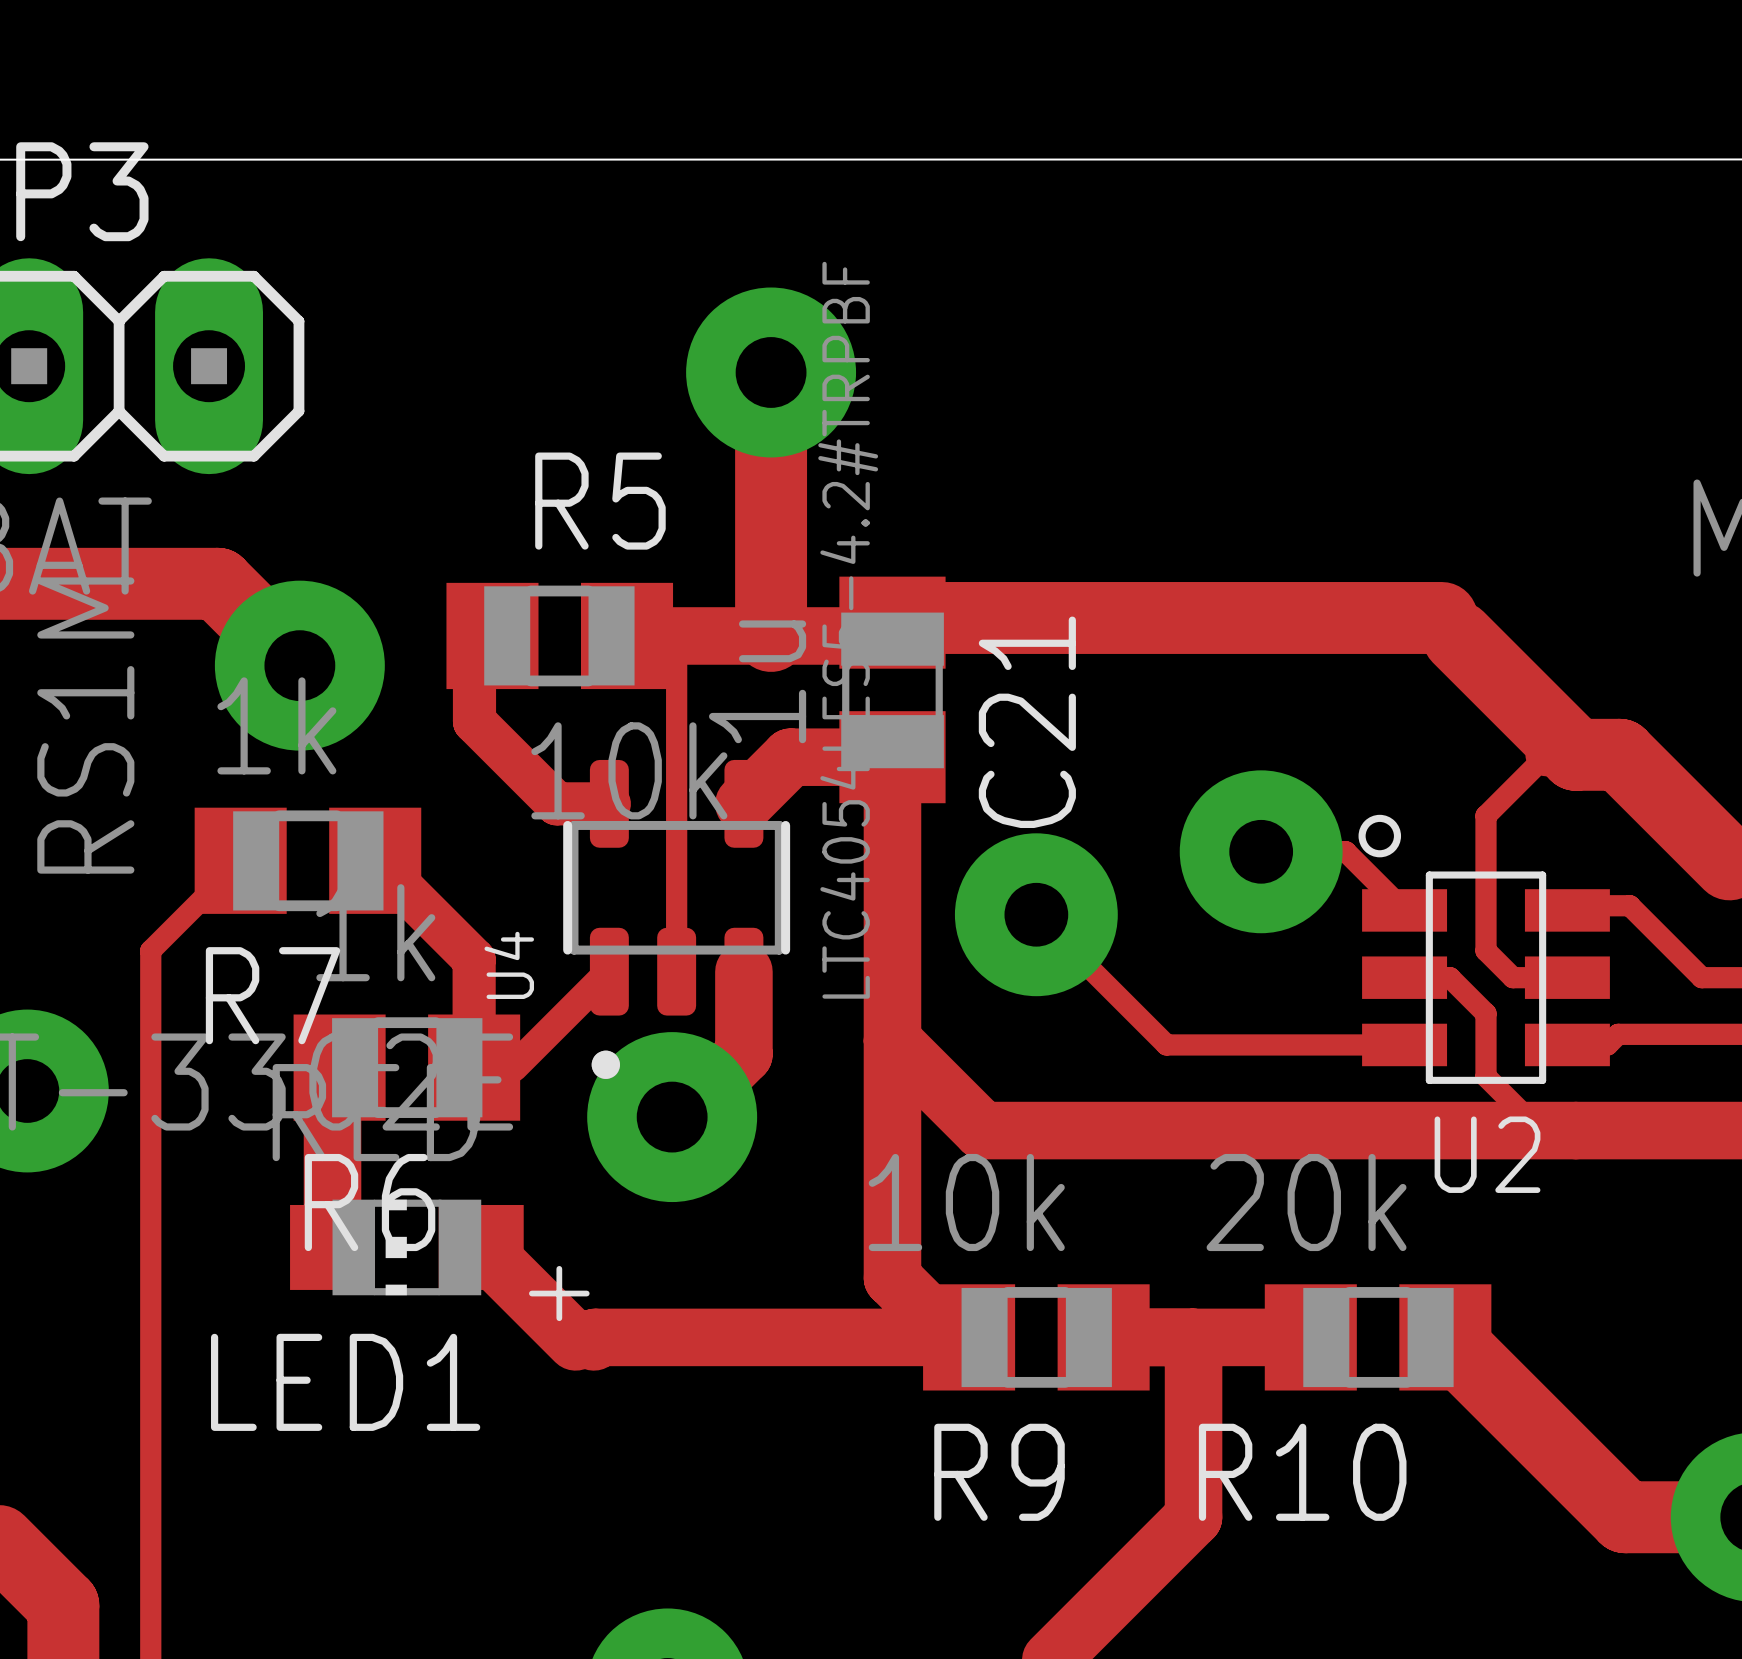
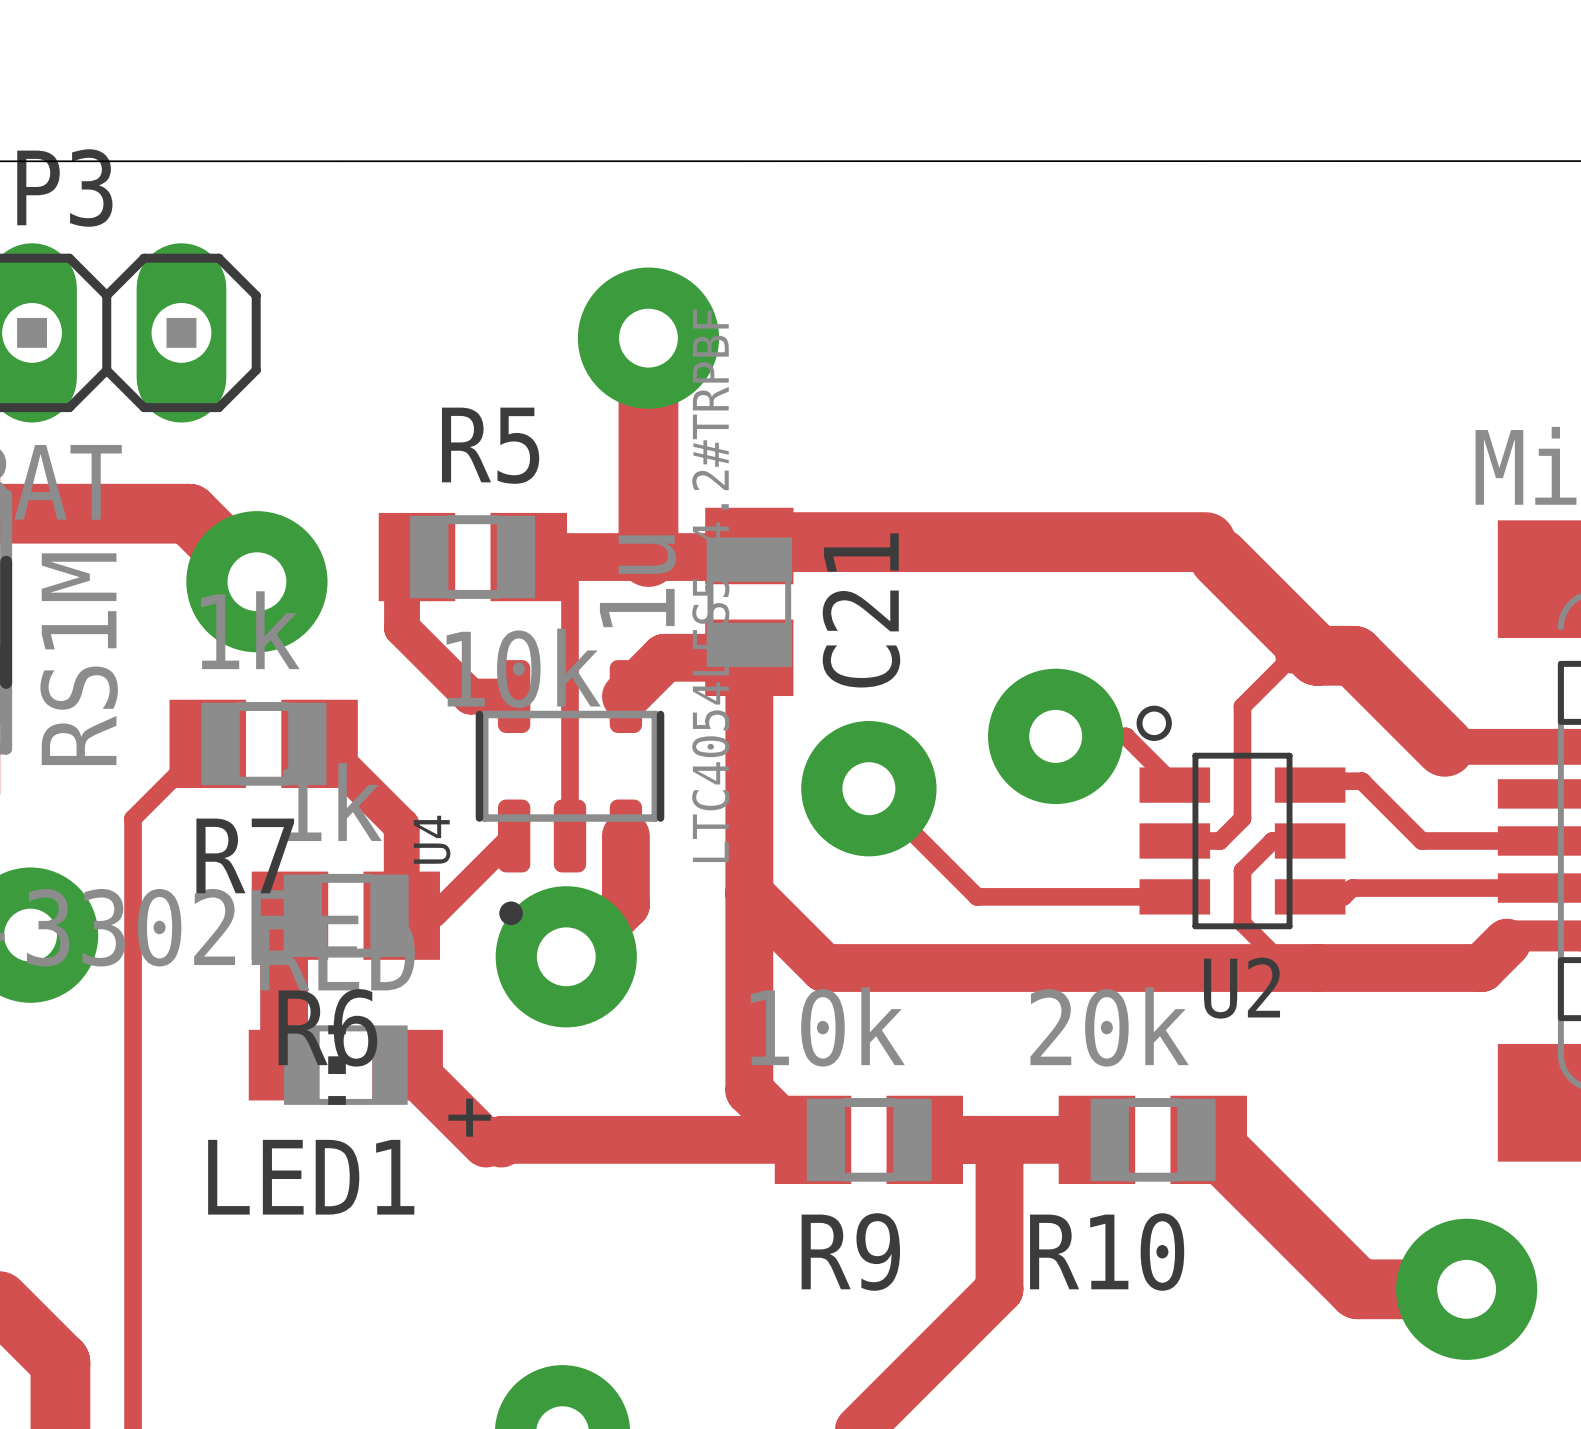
track: (1485, 950) (1512, 977) (1521, 977) -> (1242, 870) (1272, 840)
track: (1450, 977) (1485, 1013) -> (1212, 840) (1220, 840) (1242, 818)

